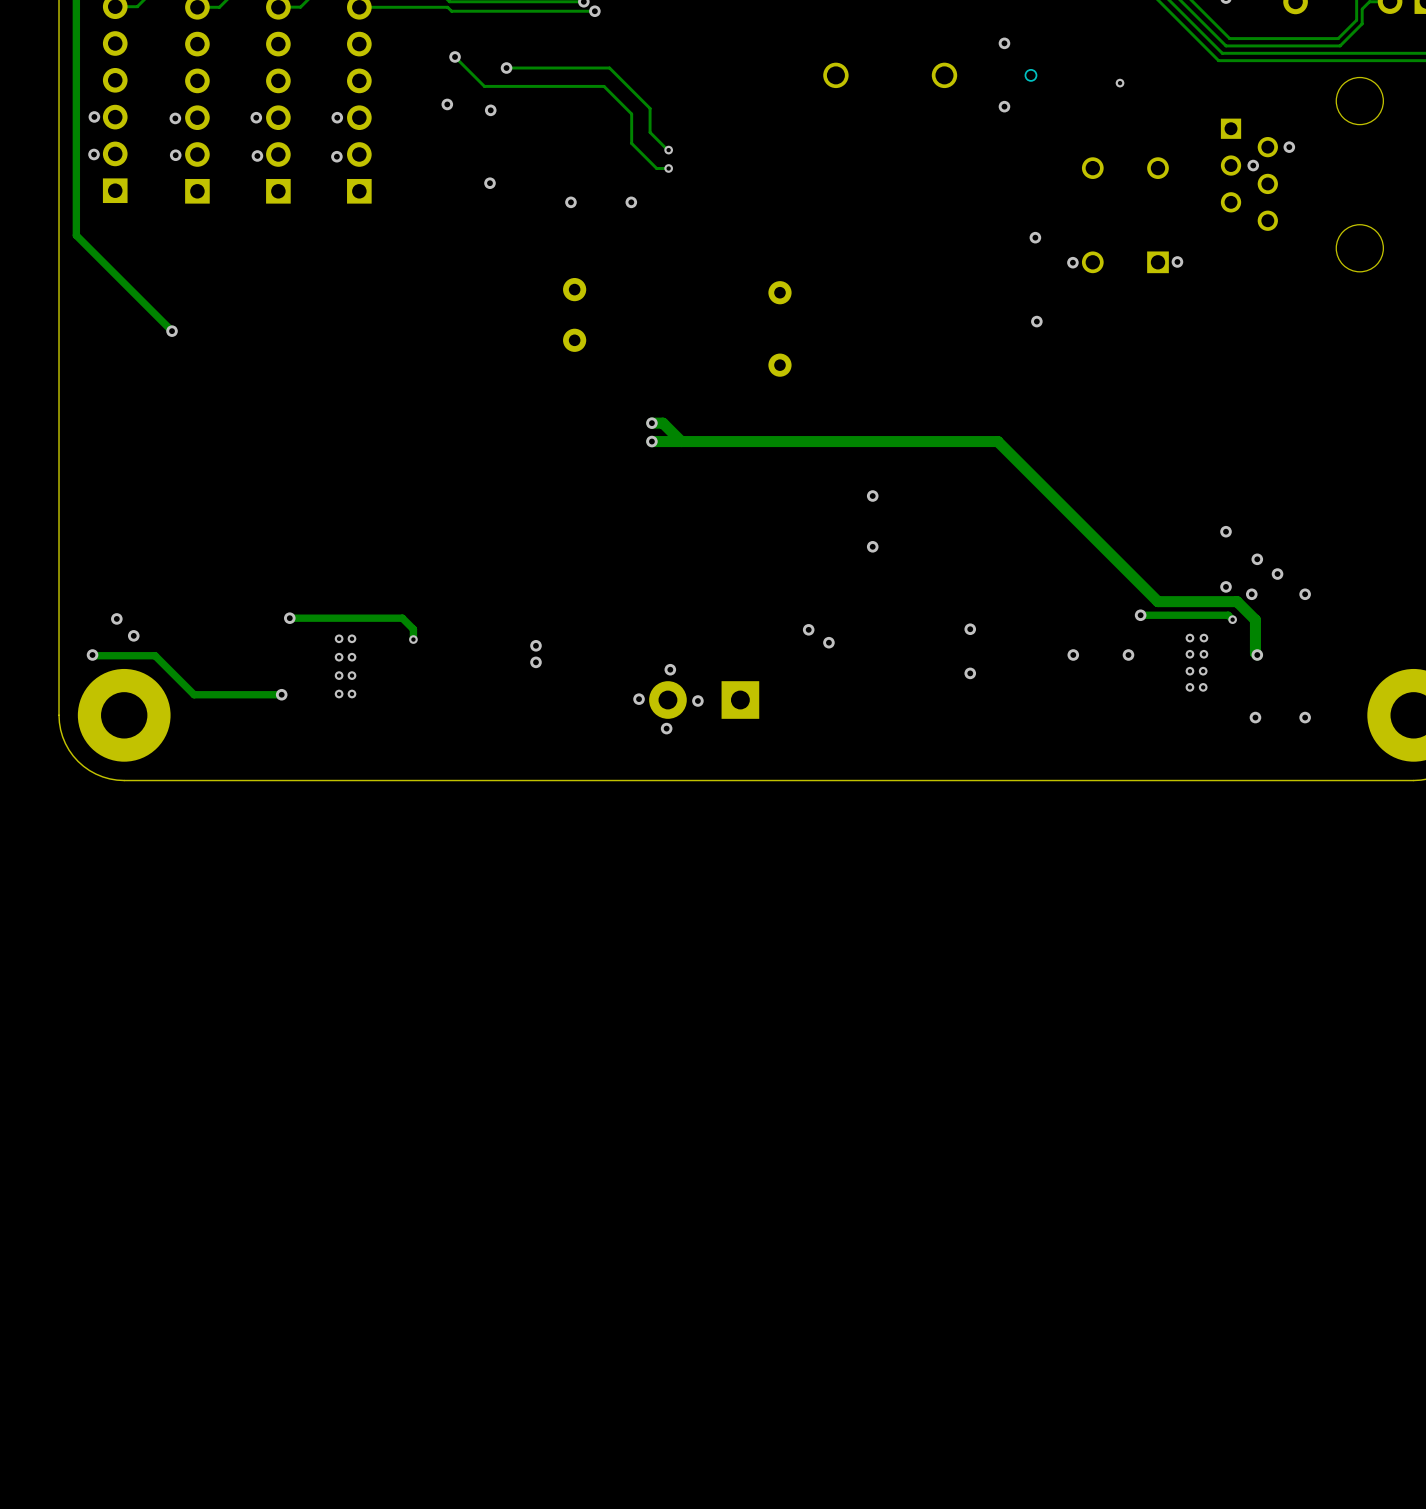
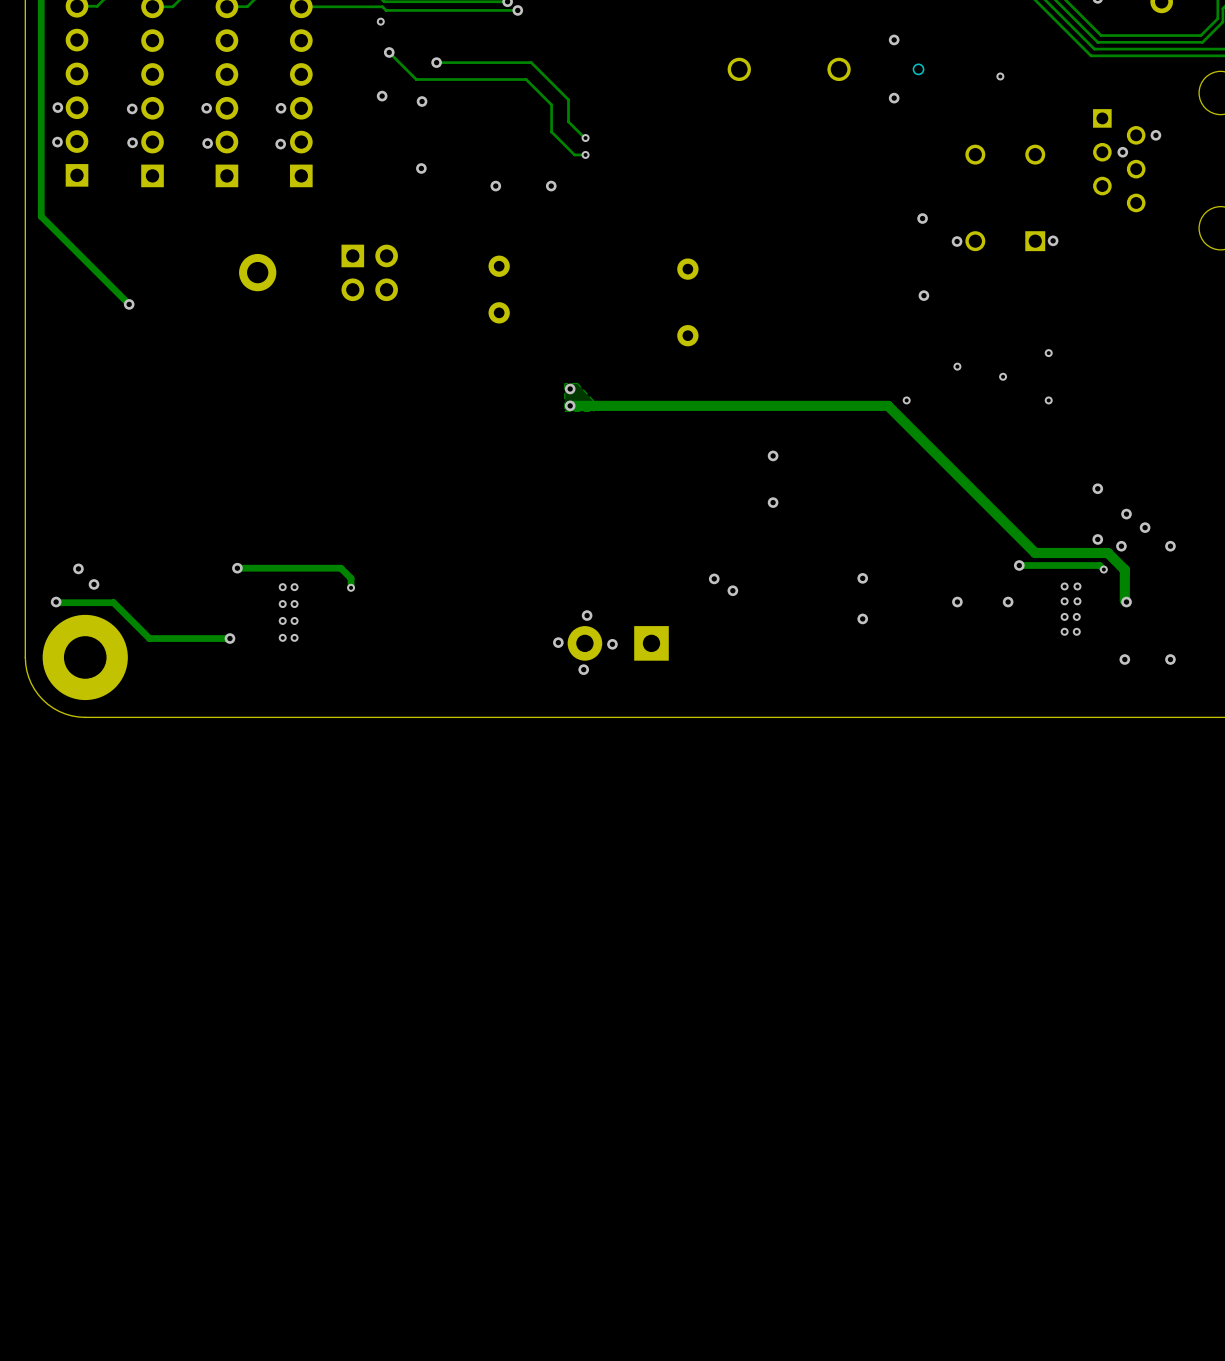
via: none -> (380, 21)
part: none -> (257, 272)
part: none -> (369, 272)
via: none -> (1048, 353)
via: none -> (957, 366)
via: none -> (1003, 376)
zone outline: none -> (577, 383) (593, 401) (593, 411) (564, 411) (564, 383) (577, 383)
track: (651, 423) (662, 423) (681, 441) -> none
via: none -> (906, 400)
via: none -> (1048, 400)
via: (535, 645) -> none
via: (535, 662) -> none

